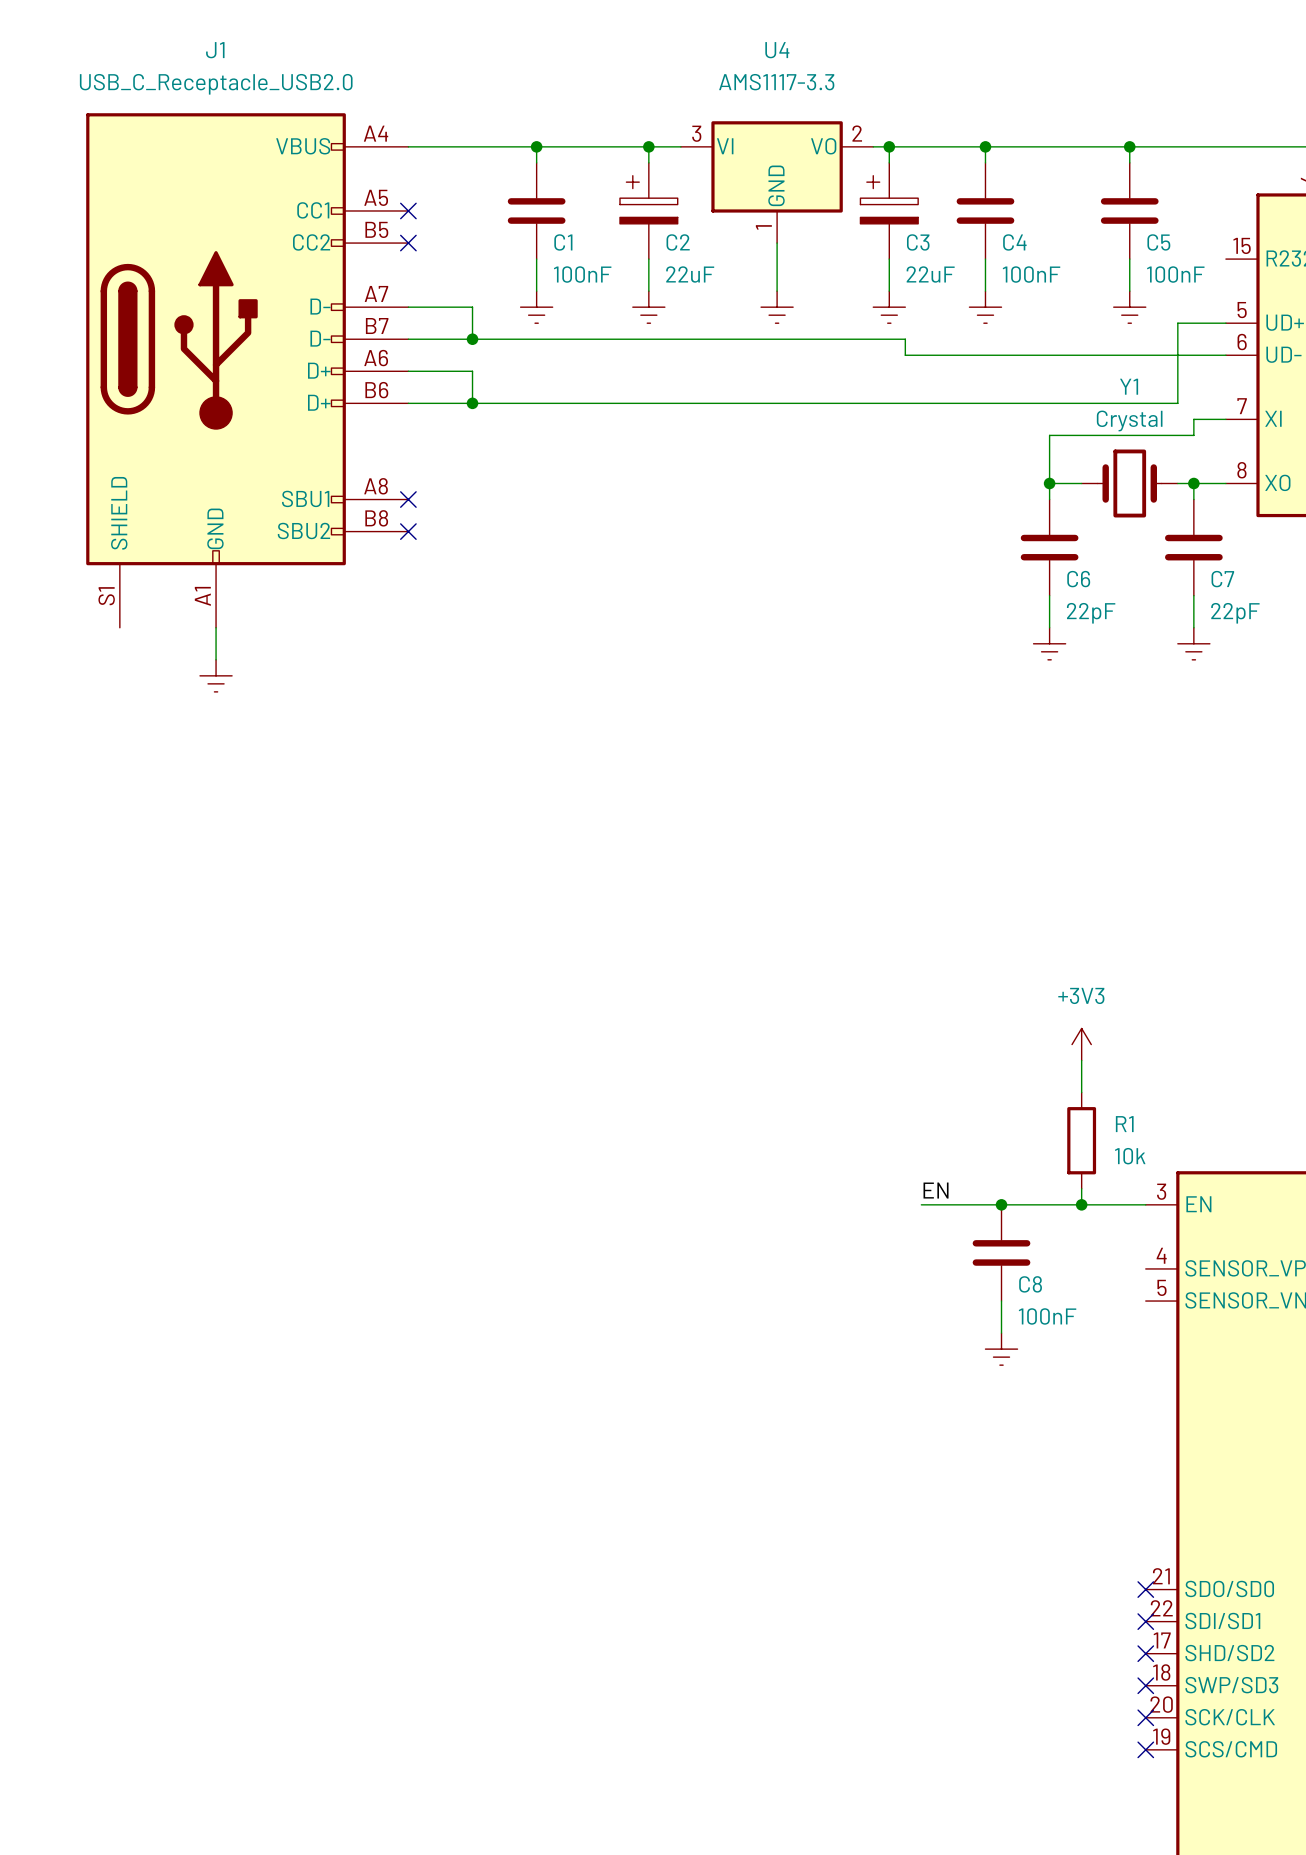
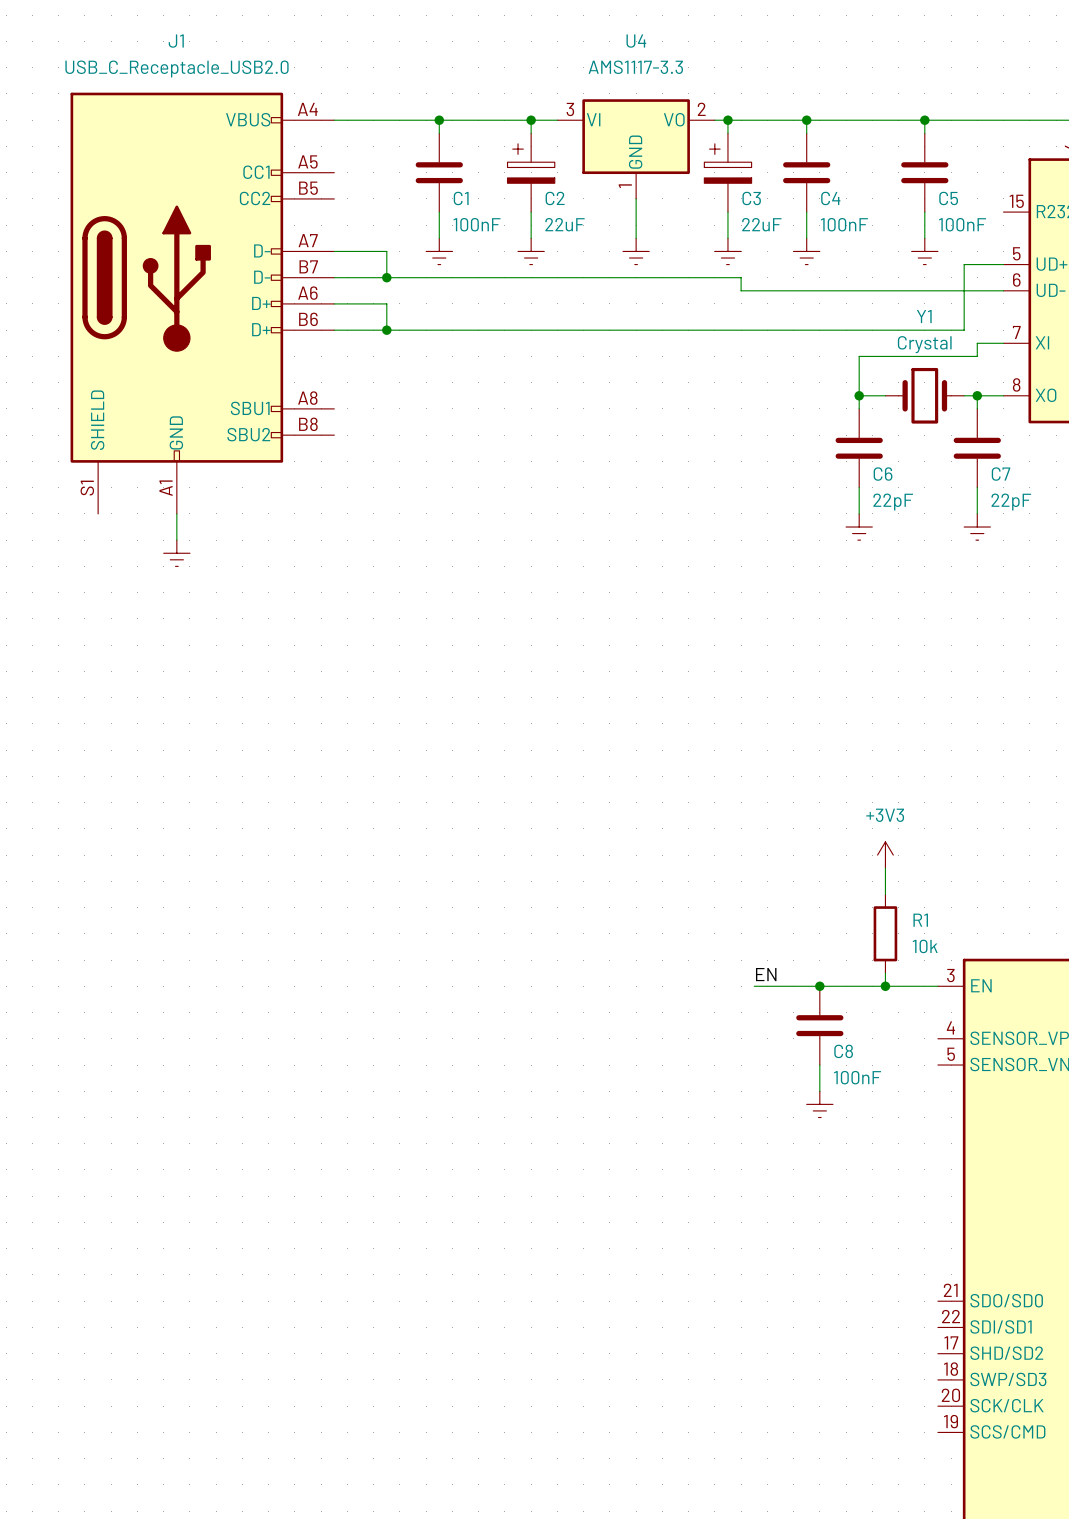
no-connect mark: (408, 210) -> none
no-connect mark: (408, 243) -> none
no-connect mark: (408, 499) -> none
no-connect mark: (408, 531) -> none
no-connect mark: (1145, 1589) -> none
no-connect mark: (1145, 1621) -> none
no-connect mark: (1145, 1653) -> none
no-connect mark: (1145, 1685) -> none
no-connect mark: (1145, 1717) -> none
no-connect mark: (1145, 1749) -> none

